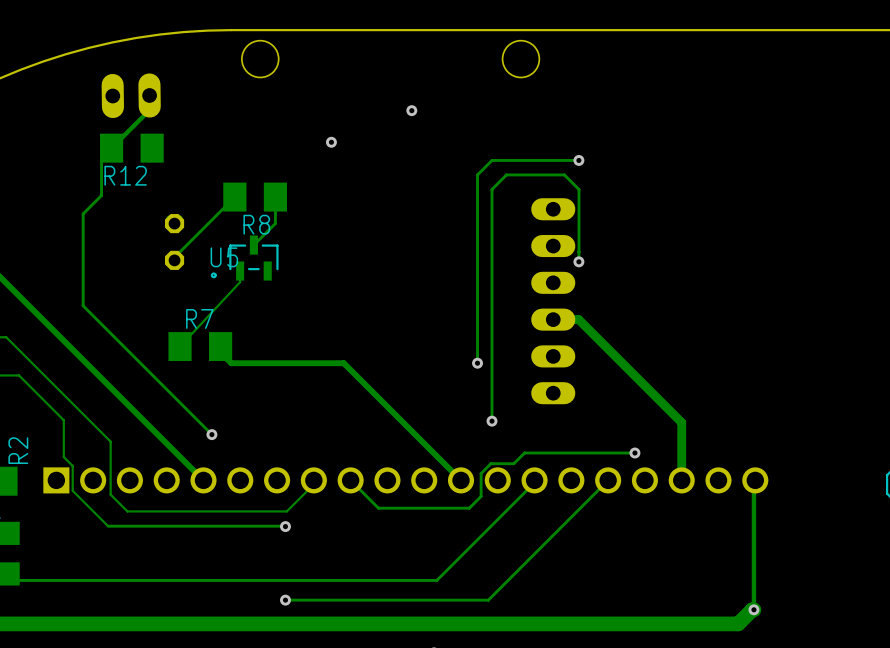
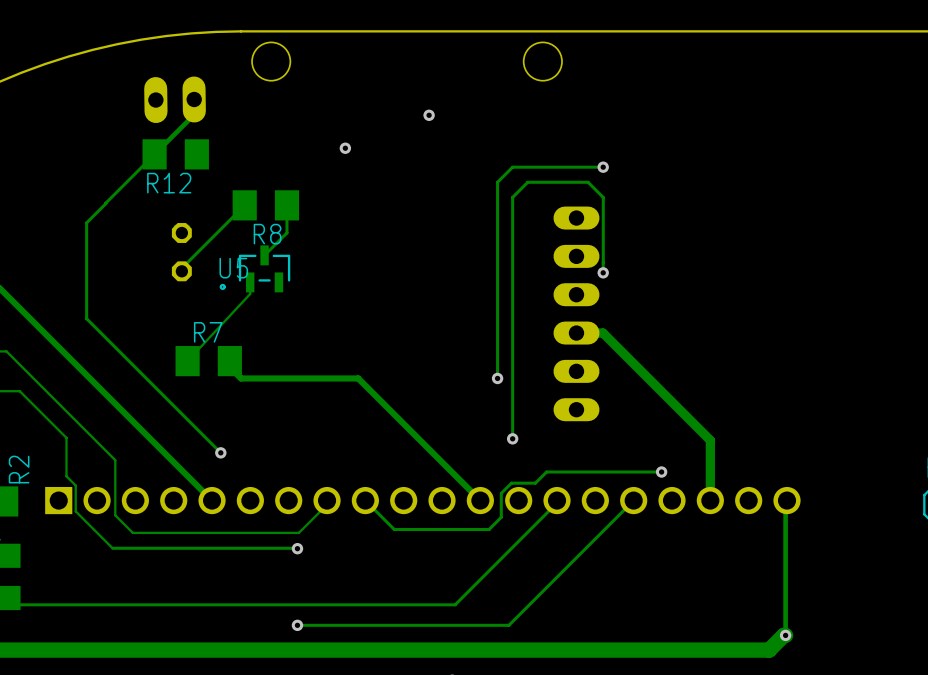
part position: (131, 95) -> (175, 99)
track: (149, 95) (149, 110) (111, 148) -> (194, 99) (194, 114) (154, 154)
track: (111, 148) (101, 158) (101, 194) -> (154, 154) (105, 203)
R12 position: (131, 148) -> (175, 154)

